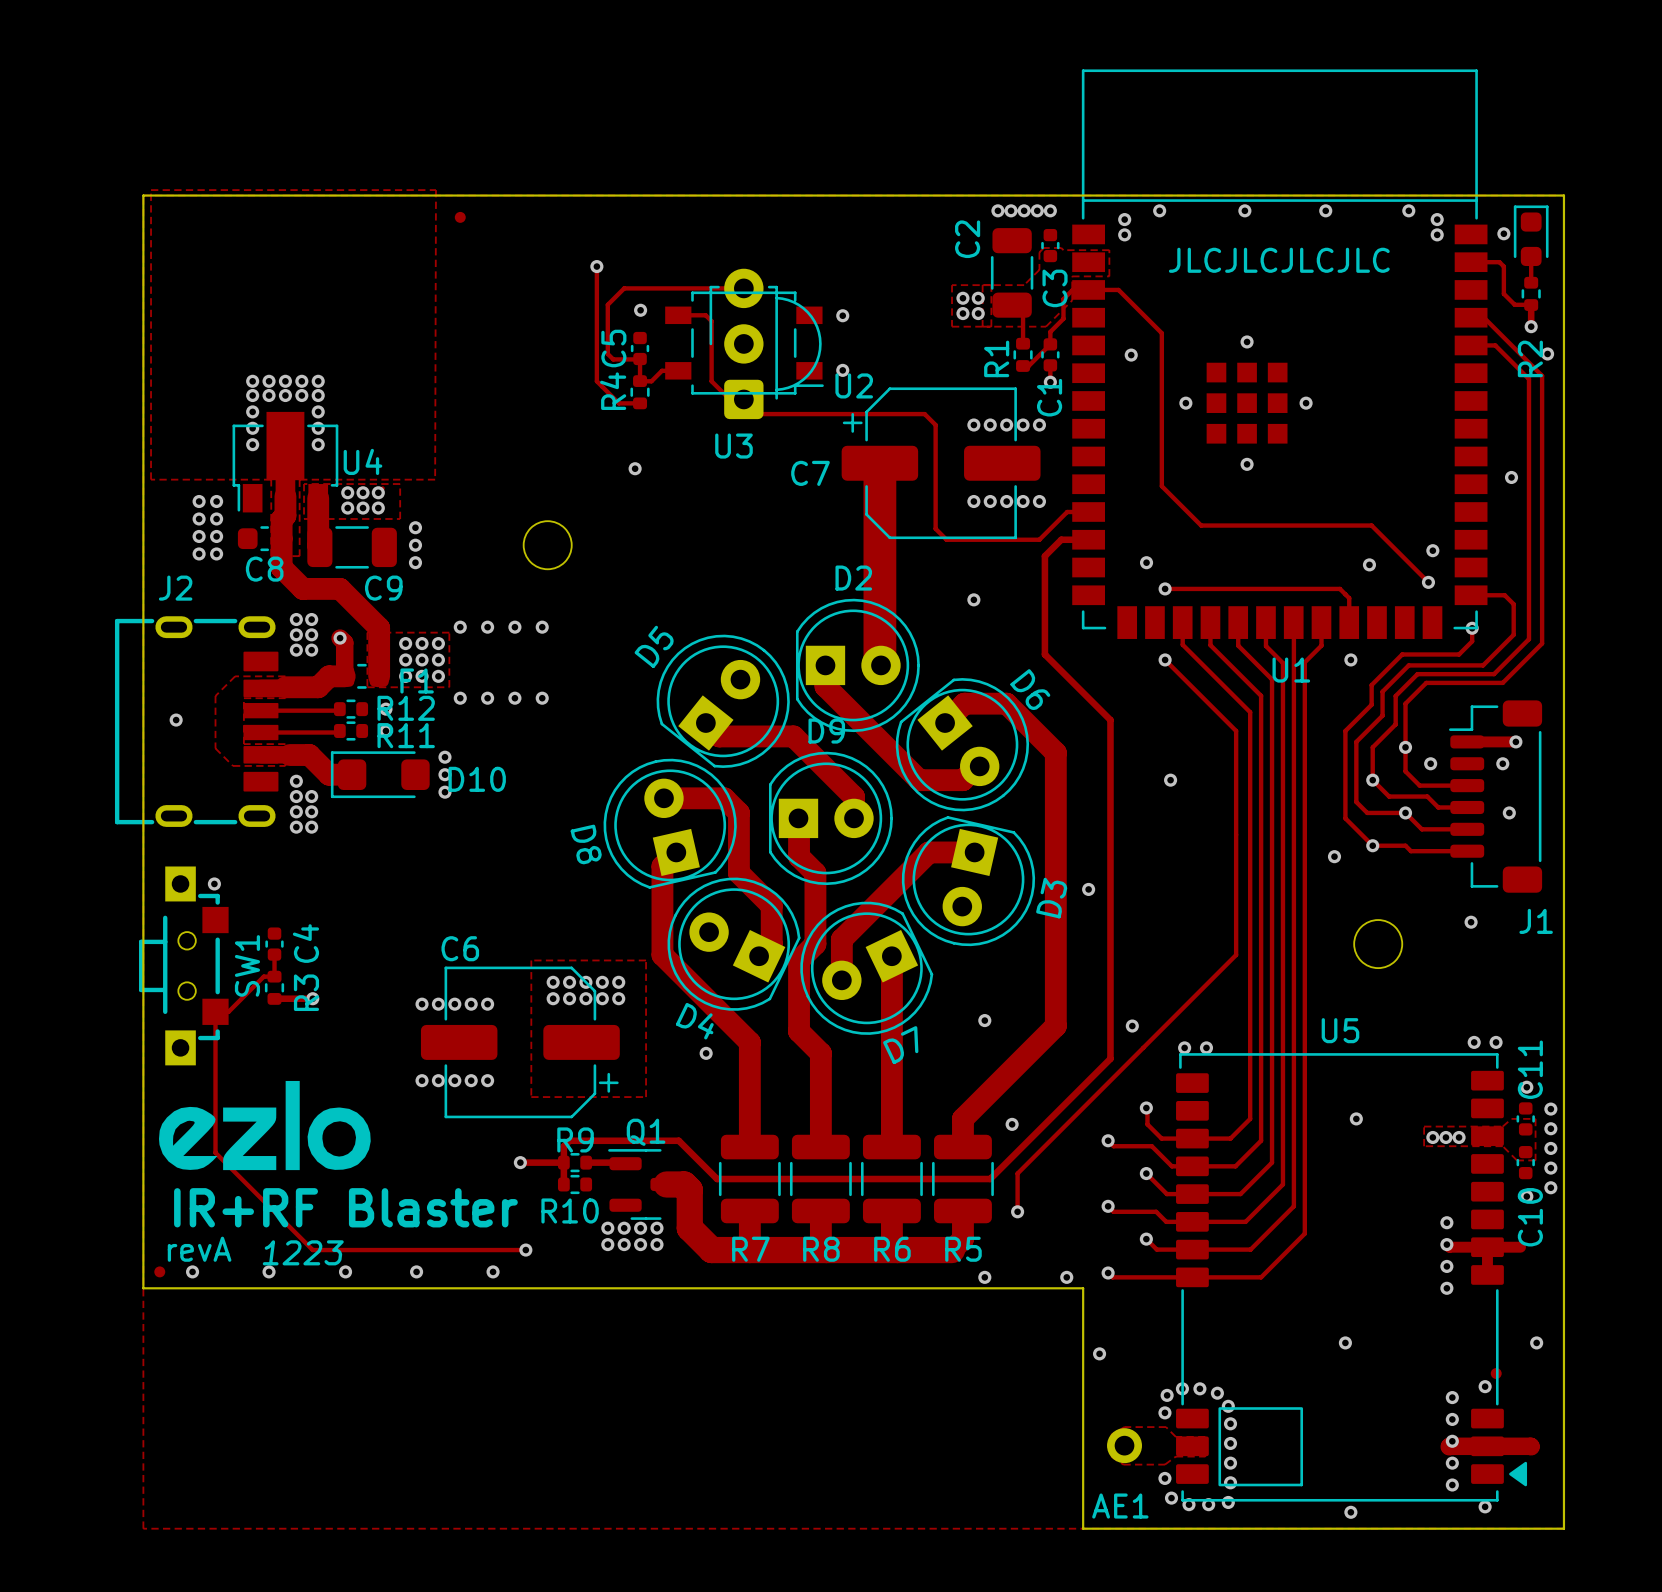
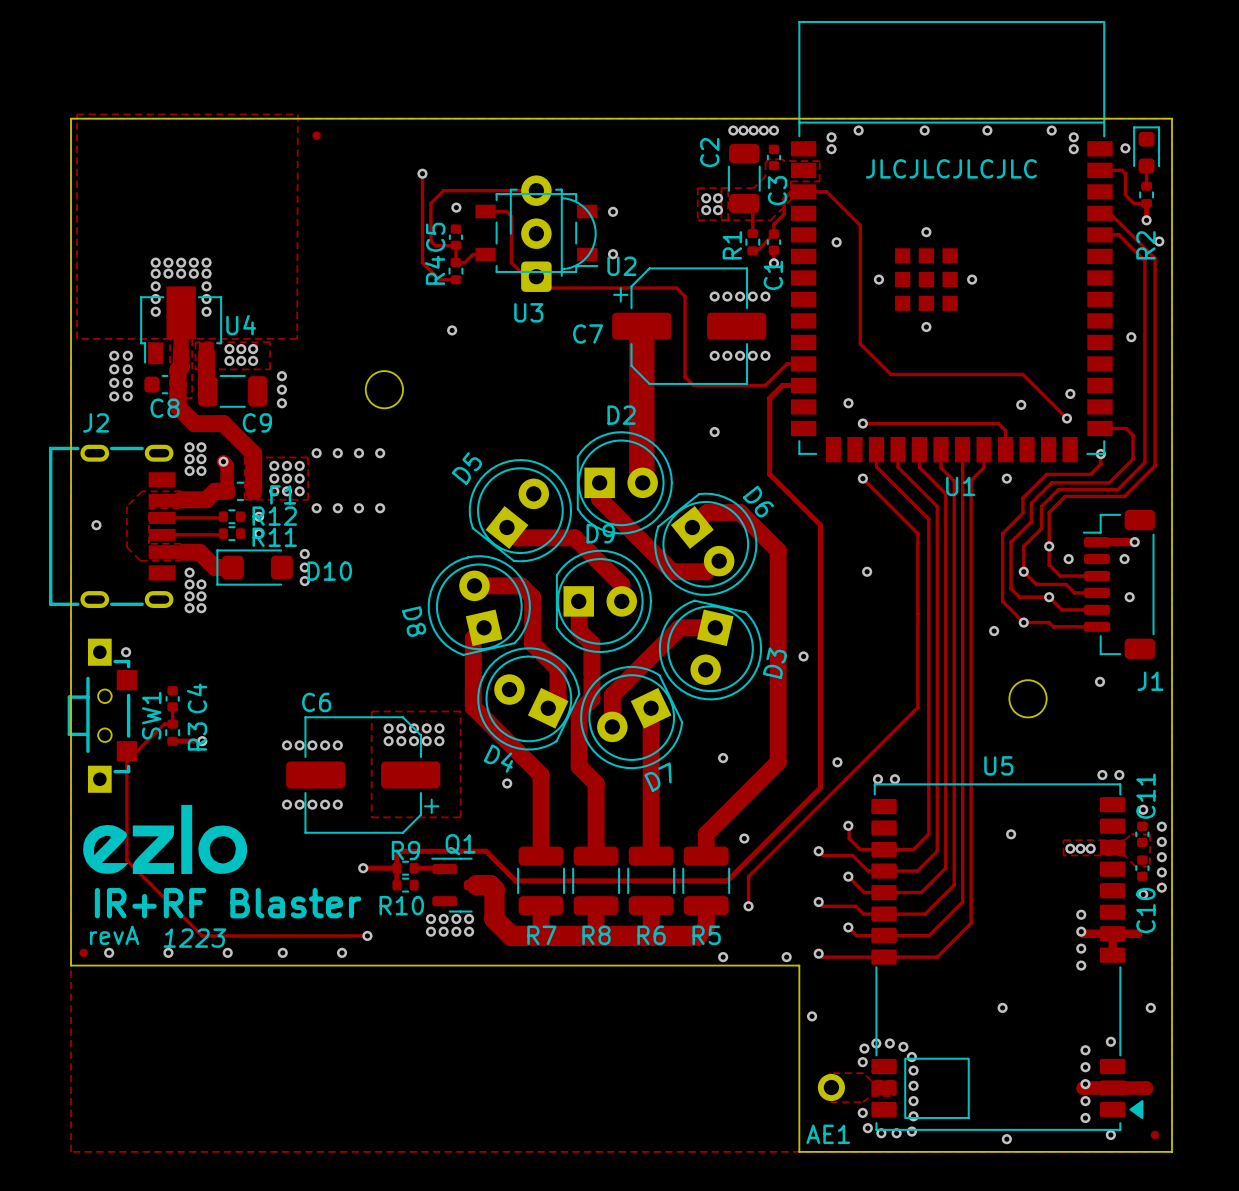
part position: (1496, 1373) -> (1155, 1134)

